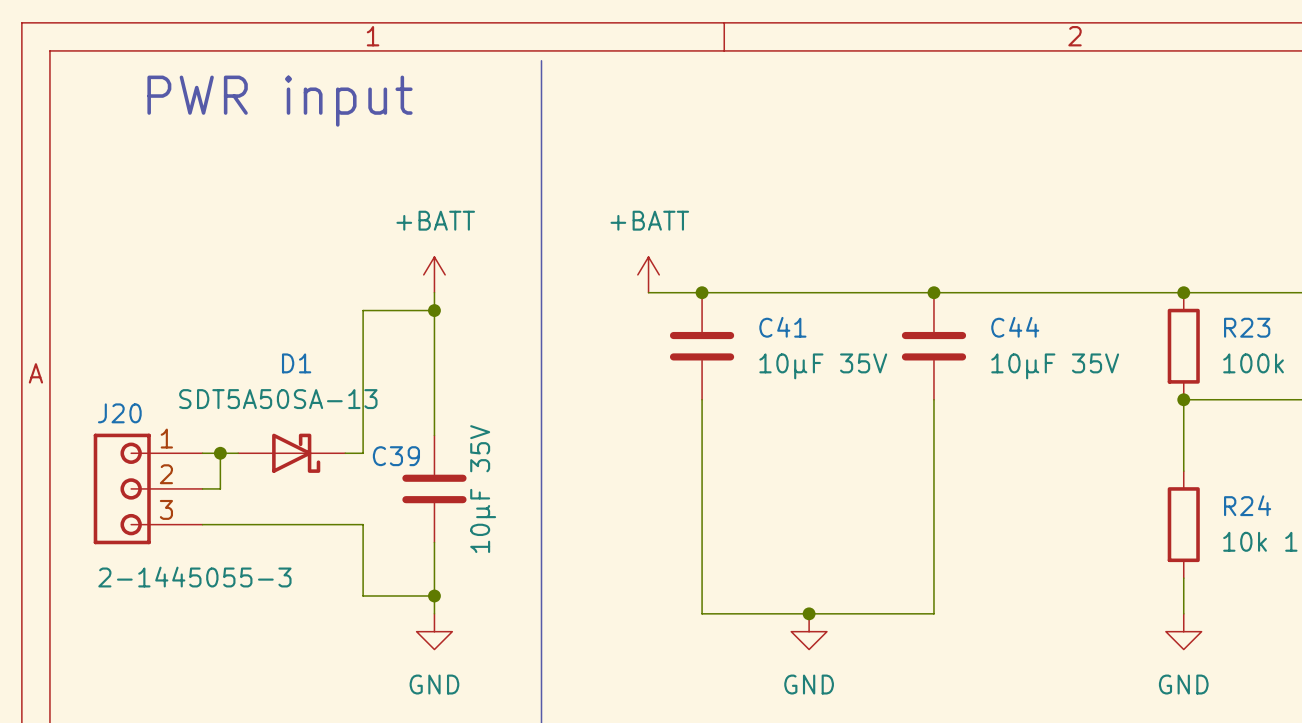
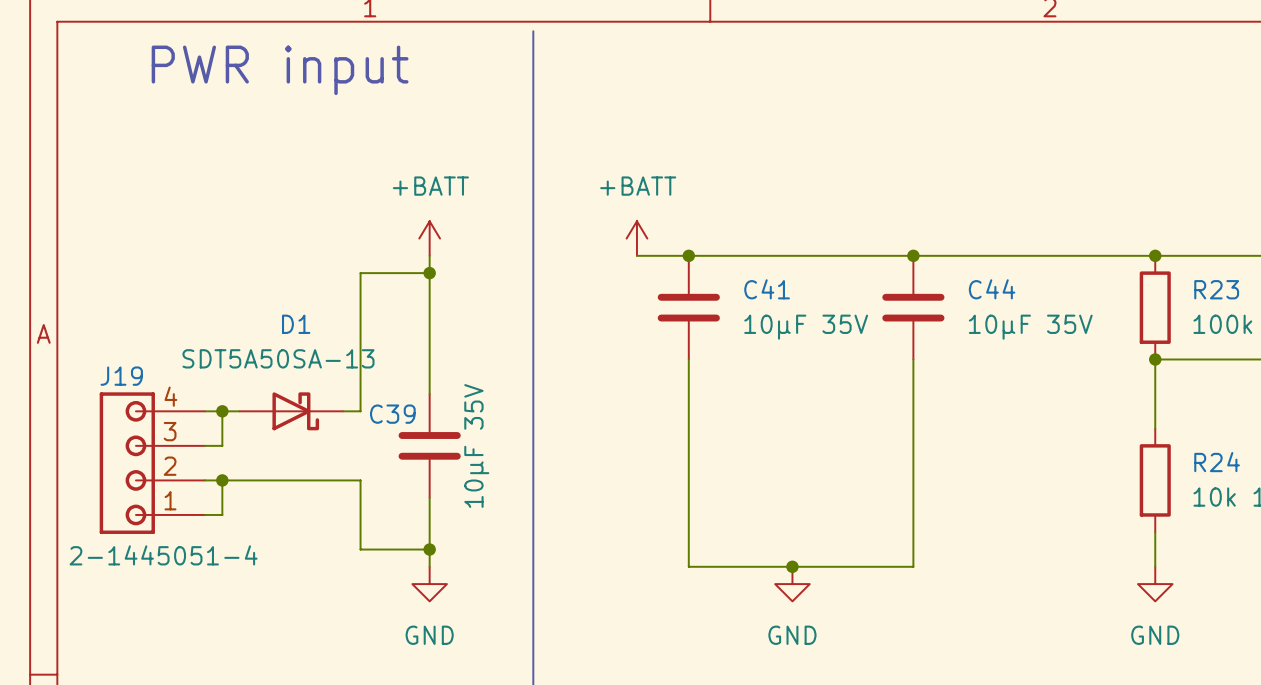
J20: 2-1445055-3 (148, 488) -> none
J19: none -> 2-1445051-4 (152, 463)
wire: none -> (222, 480) (222, 514) (205, 514)
junction: none -> (222, 480)

